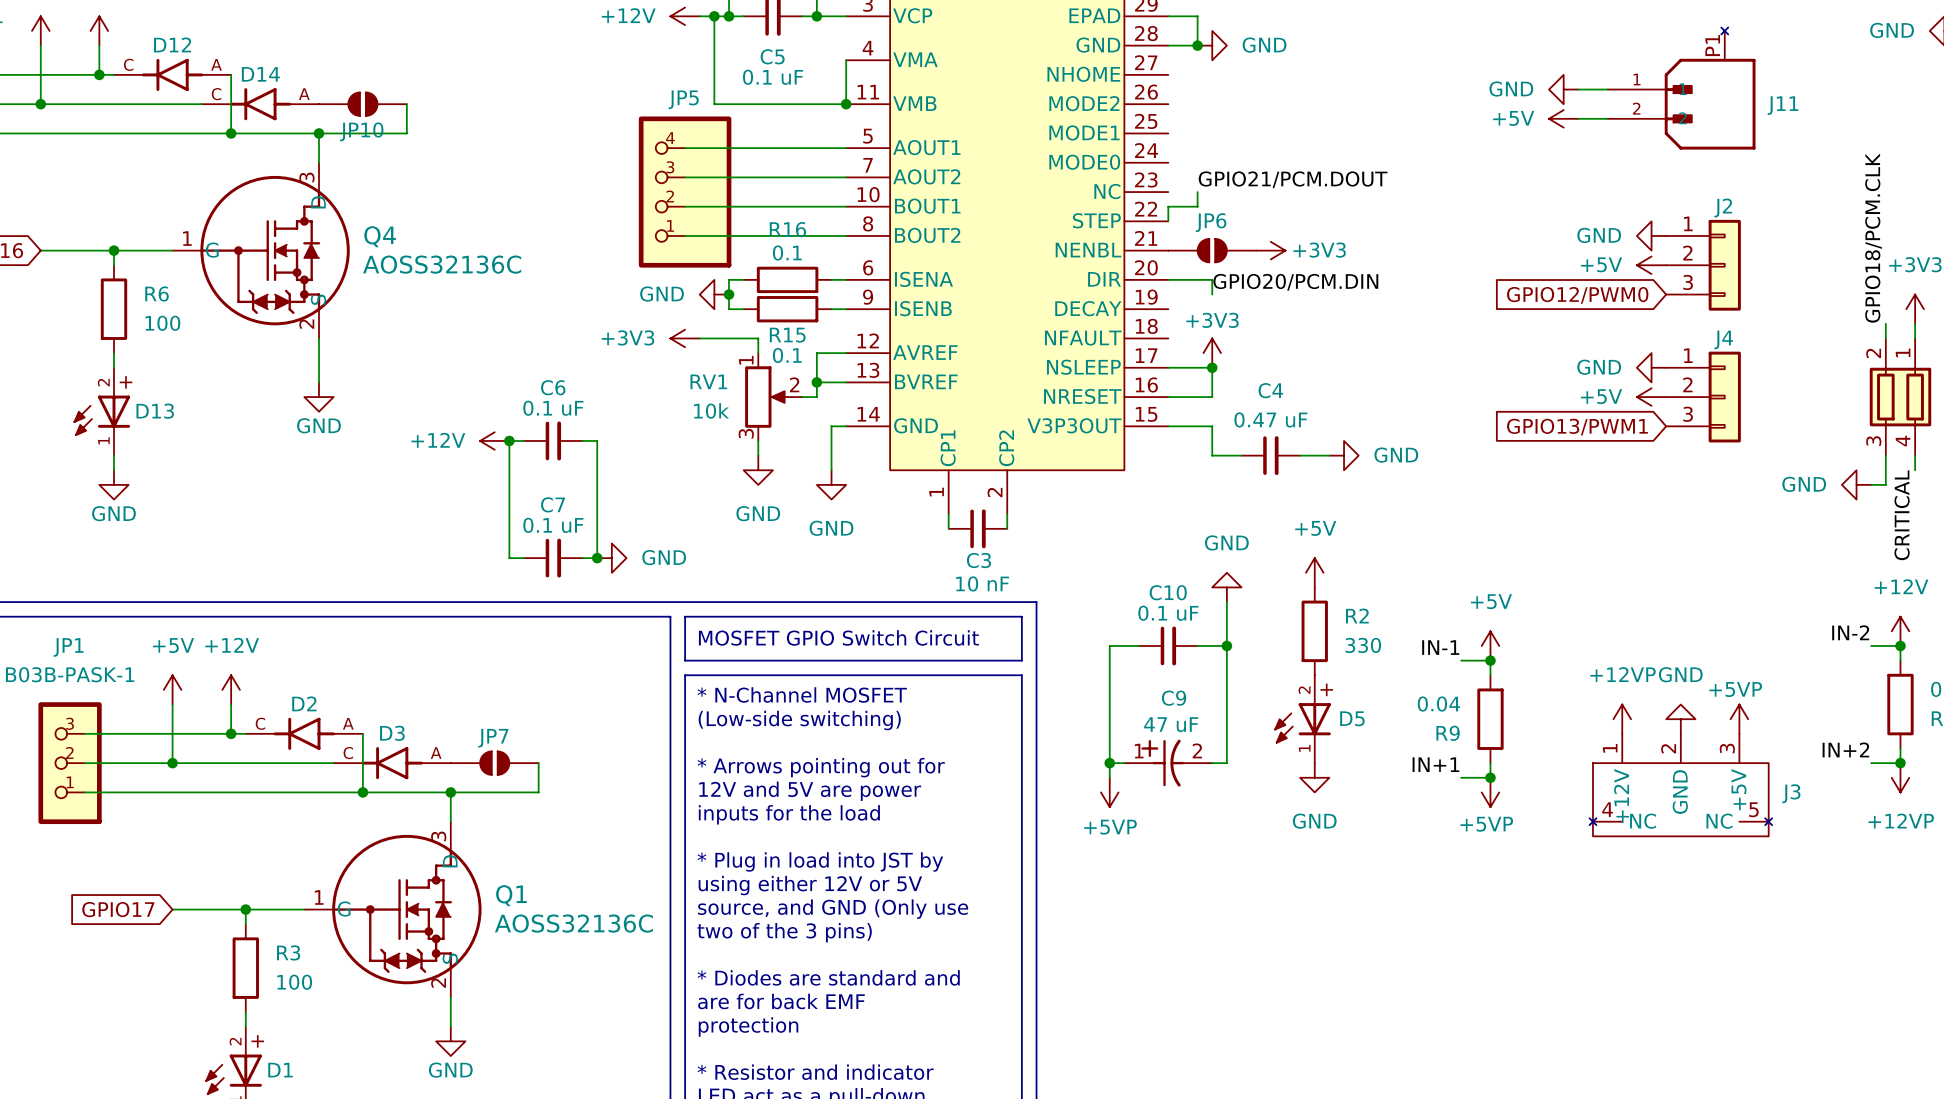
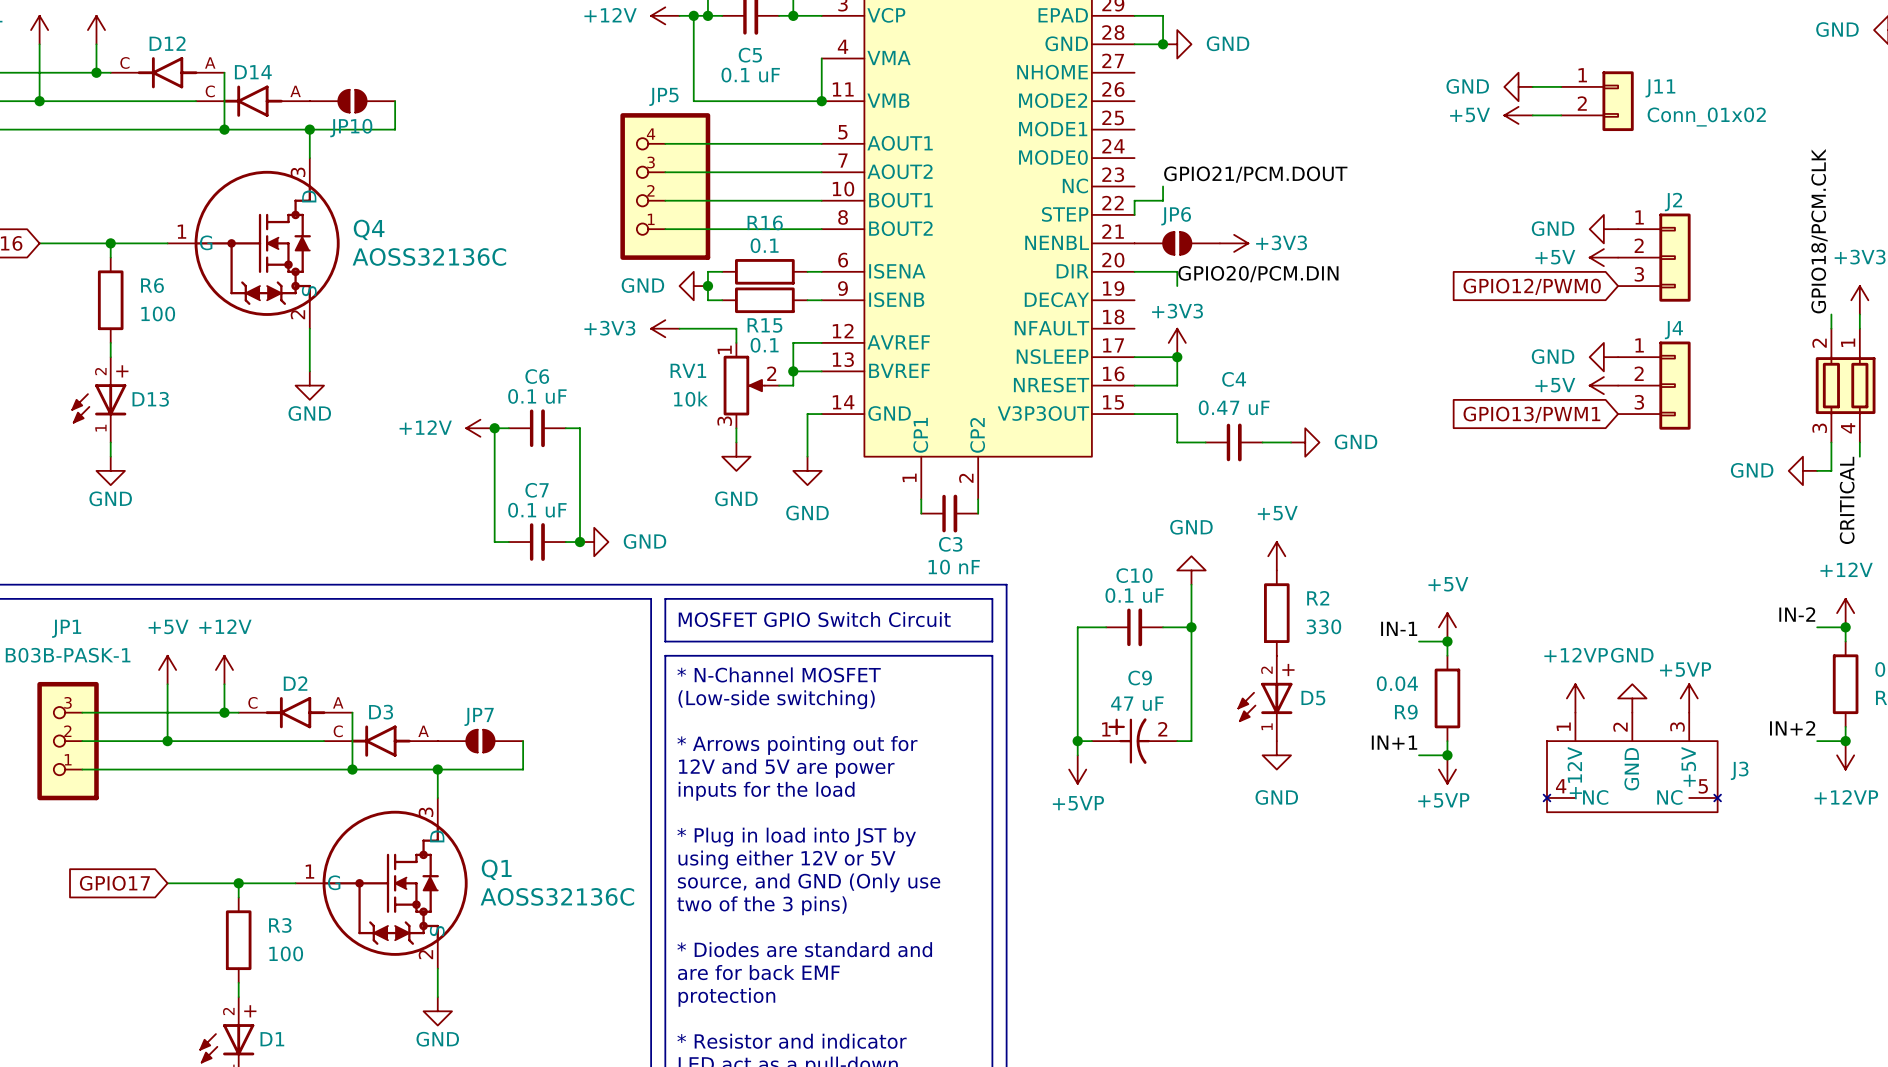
J11 symbol: [1607, 27, 1756, 150] -> [1561, 71, 1634, 132]
J11 name position: J11 (1782, 105) -> J11 (1660, 88)
J11 value: none -> Conn_01x02 (1706, 117)

